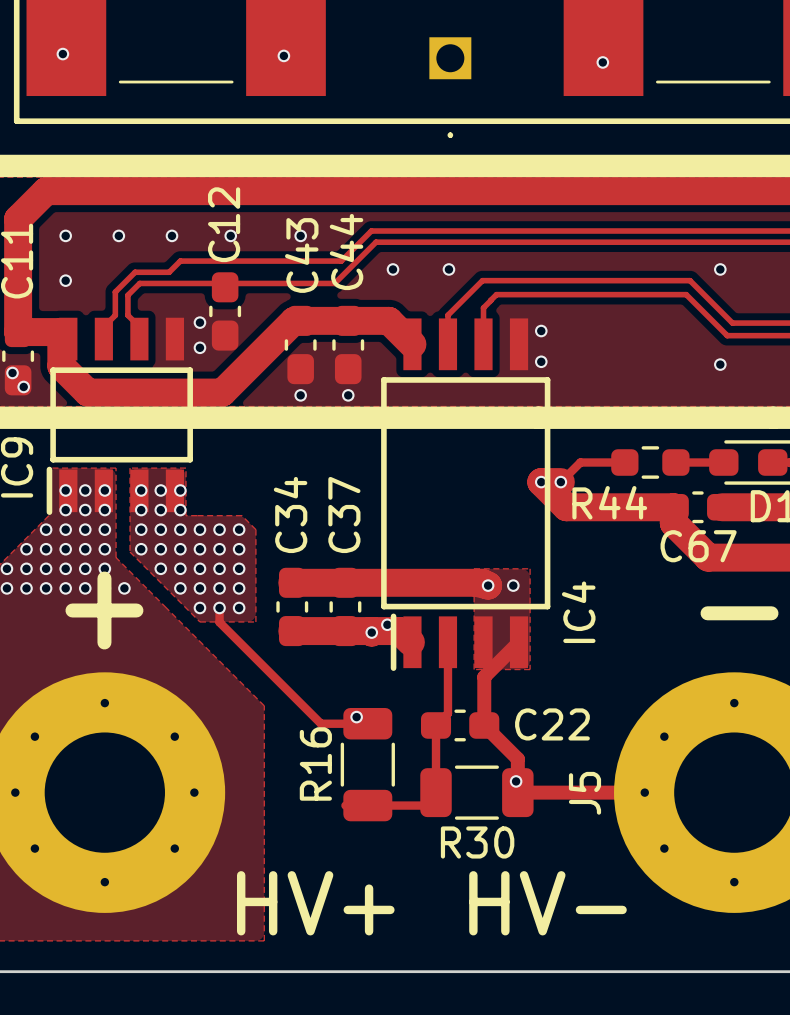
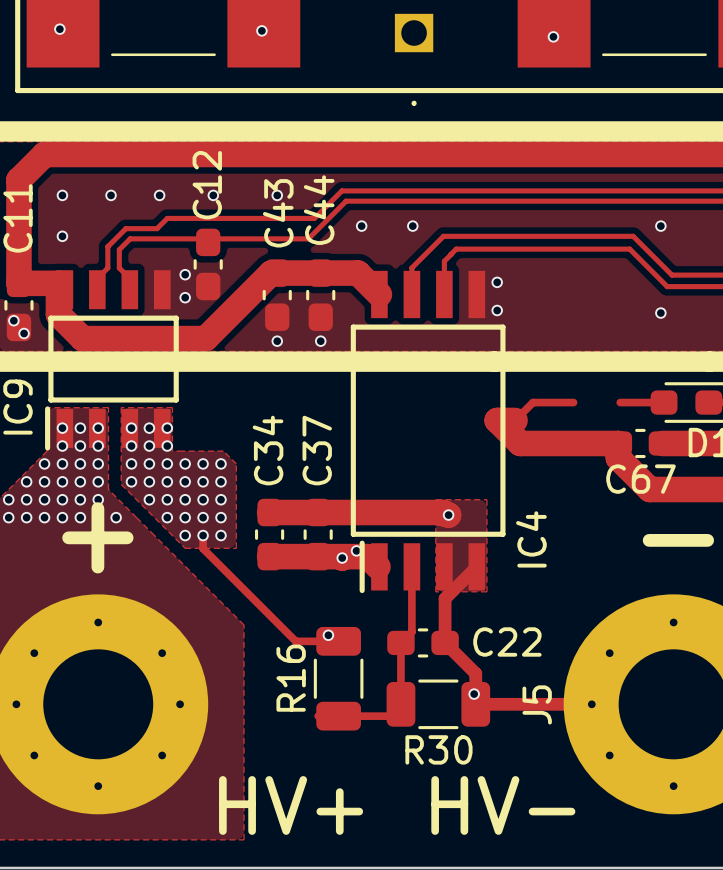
R44: (650, 462) -> none
via: (541, 482) -> none
via: (560, 482) -> none
via: (513, 585) -> none

